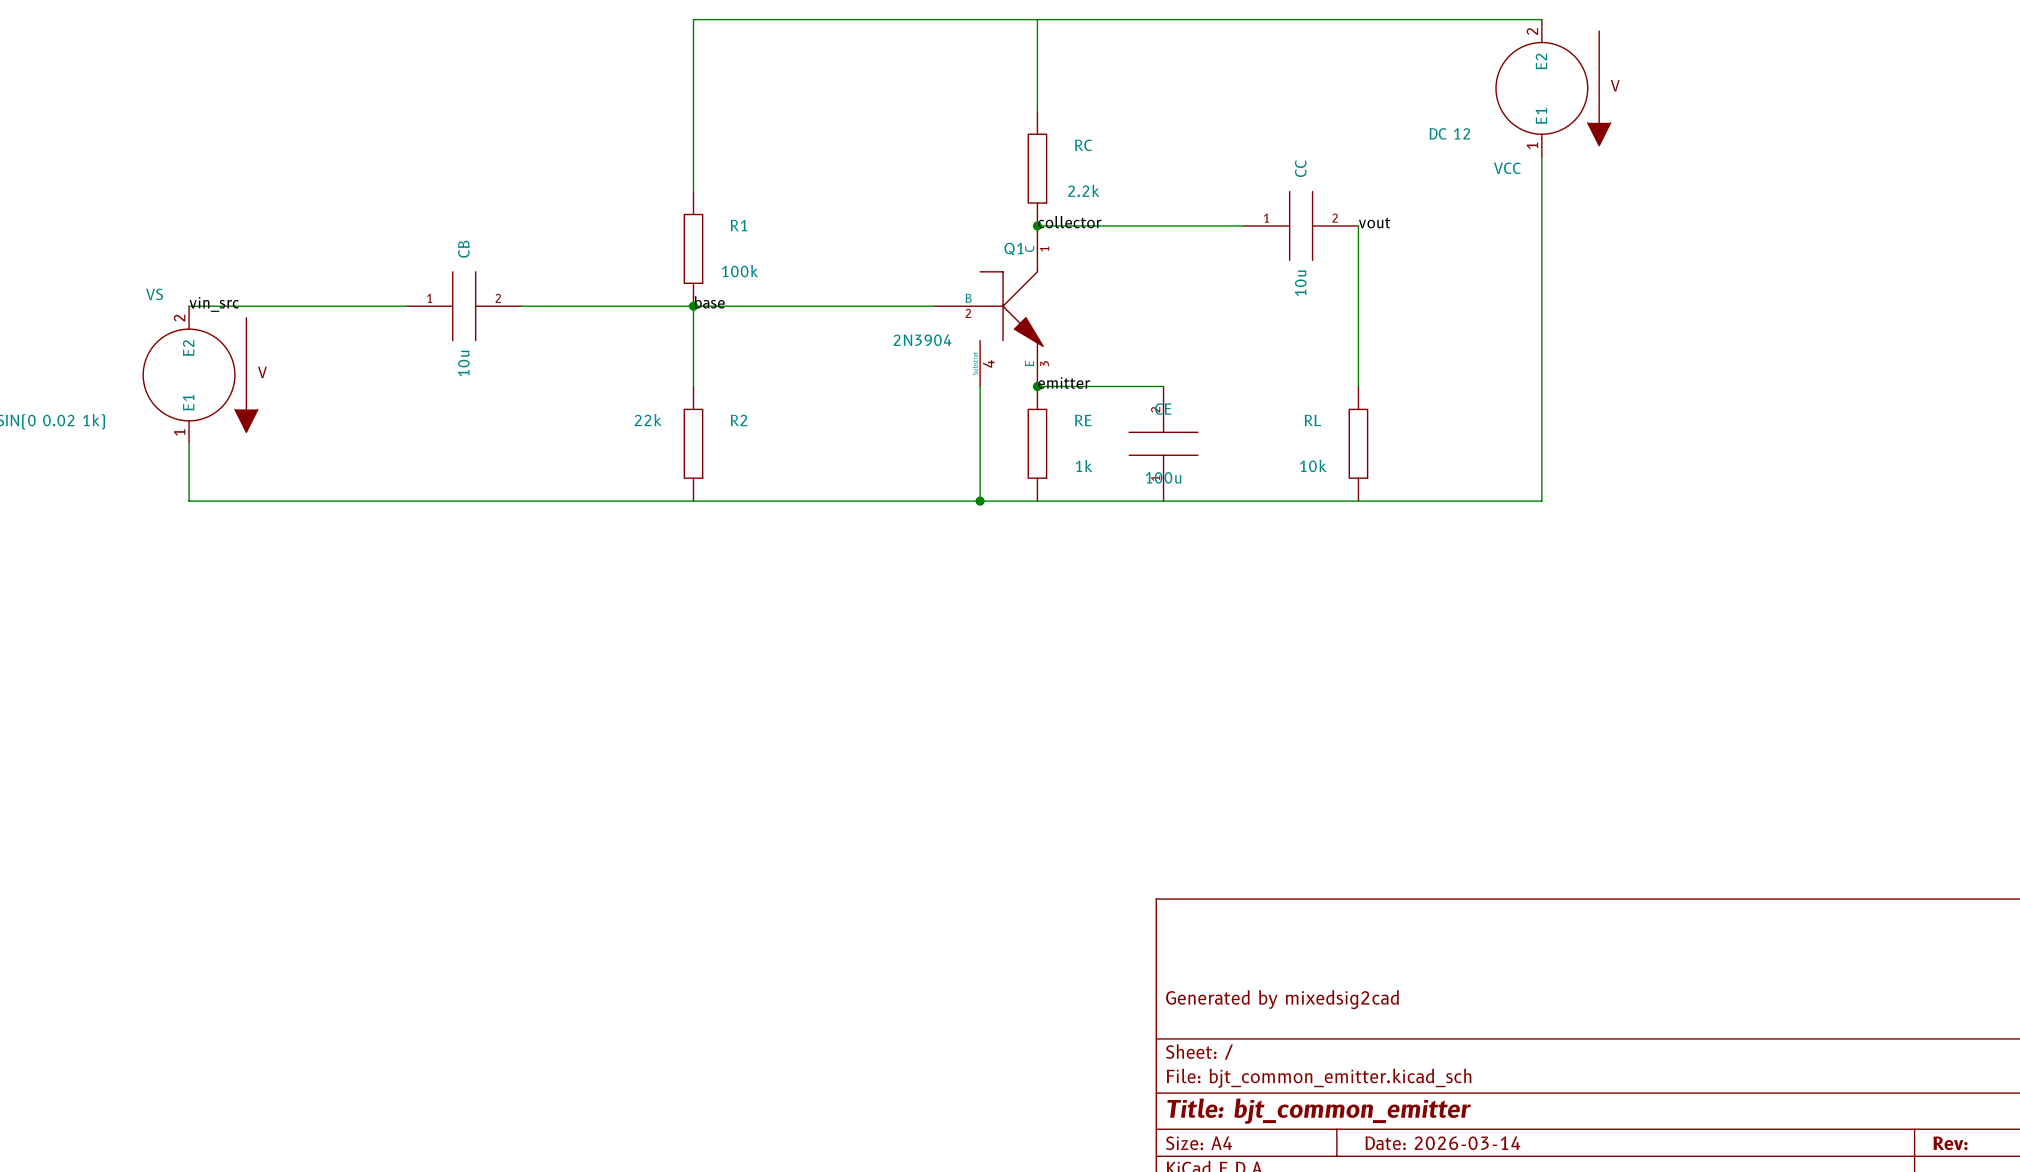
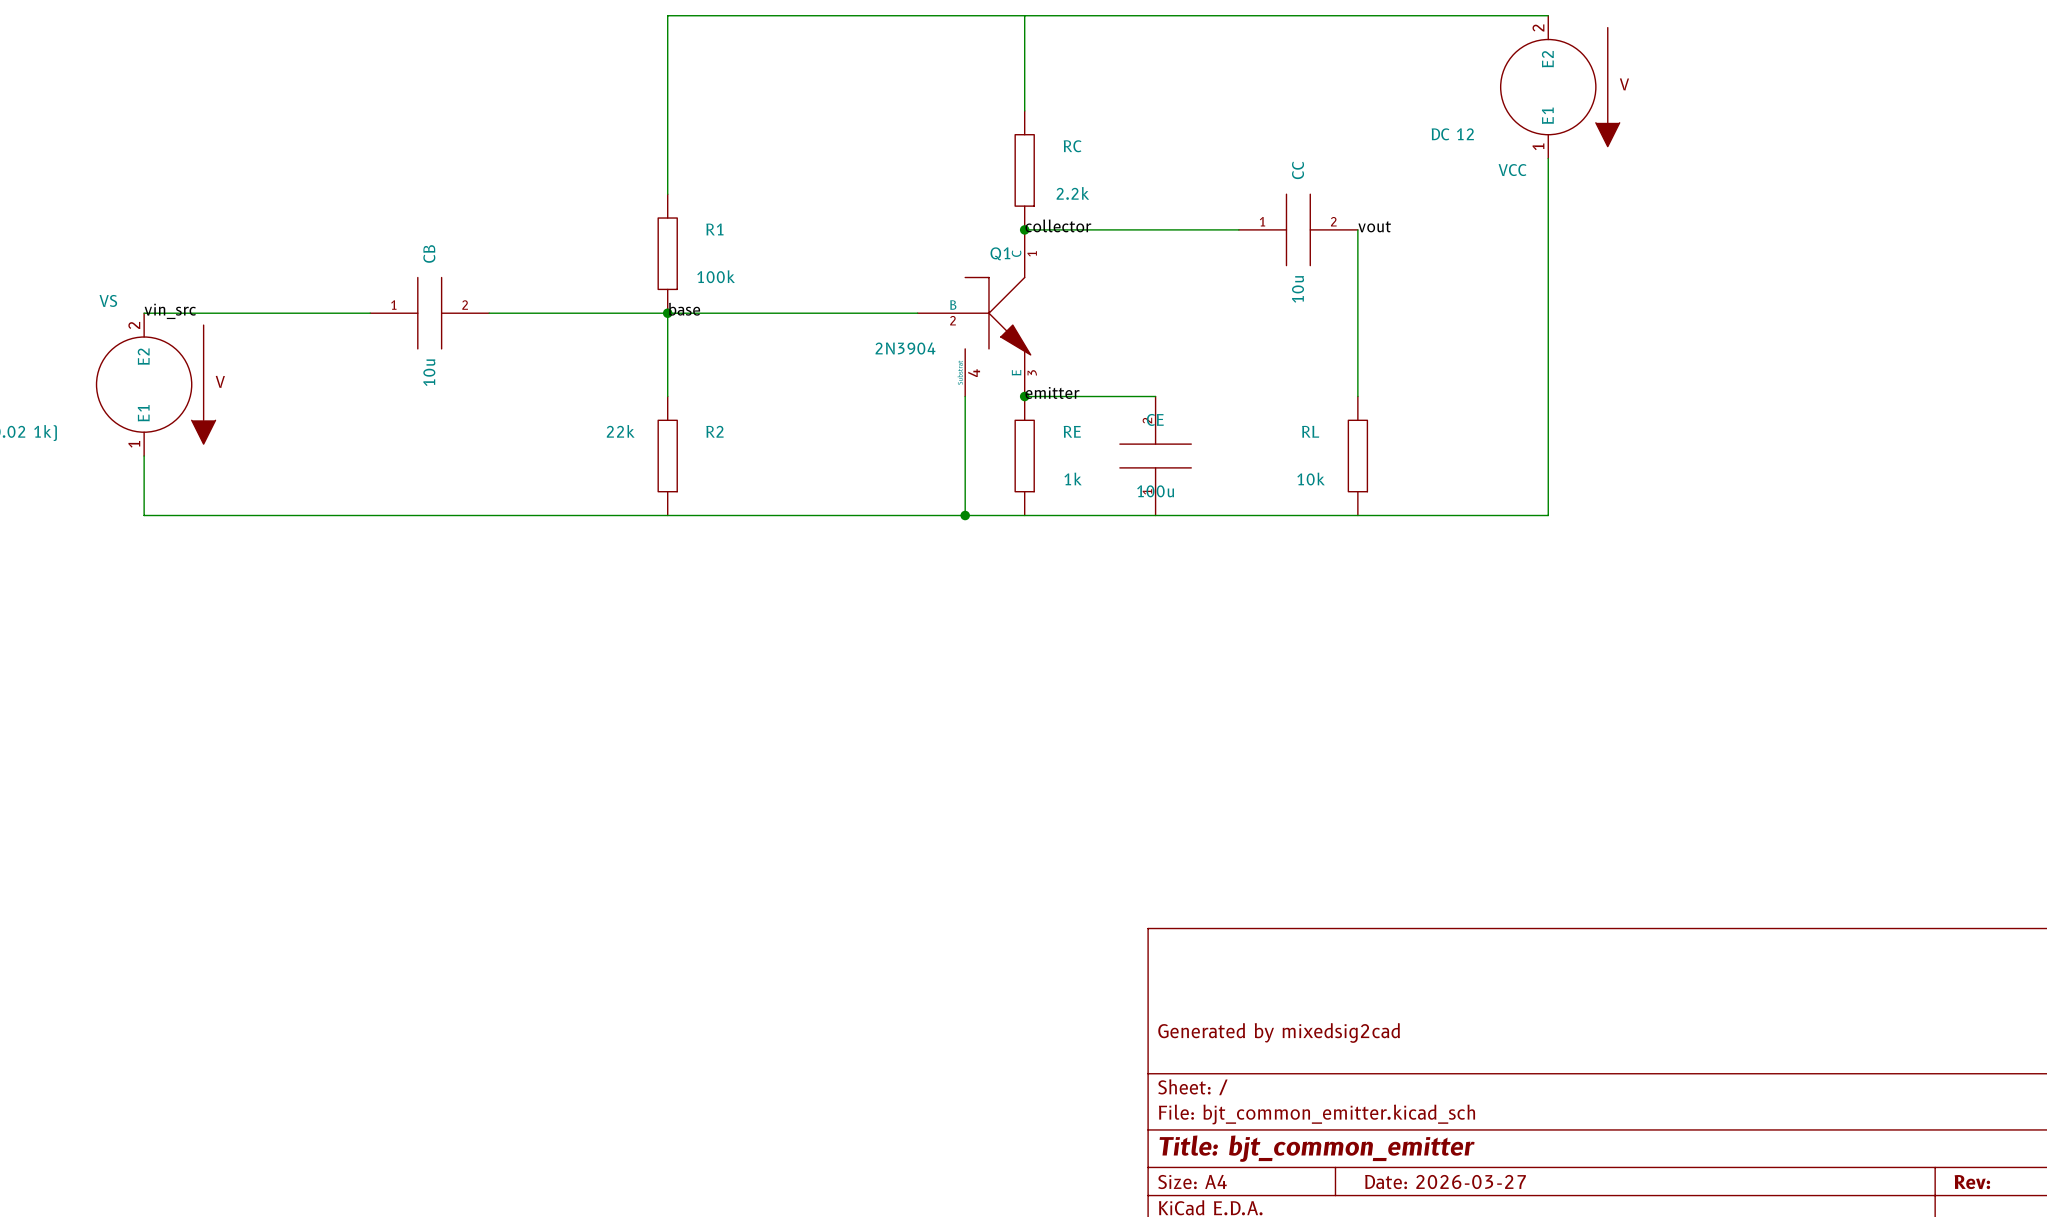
title block: Date: 2026-03-14 (1442, 1143) -> Date: 2026-03-27 (1445, 1182)

